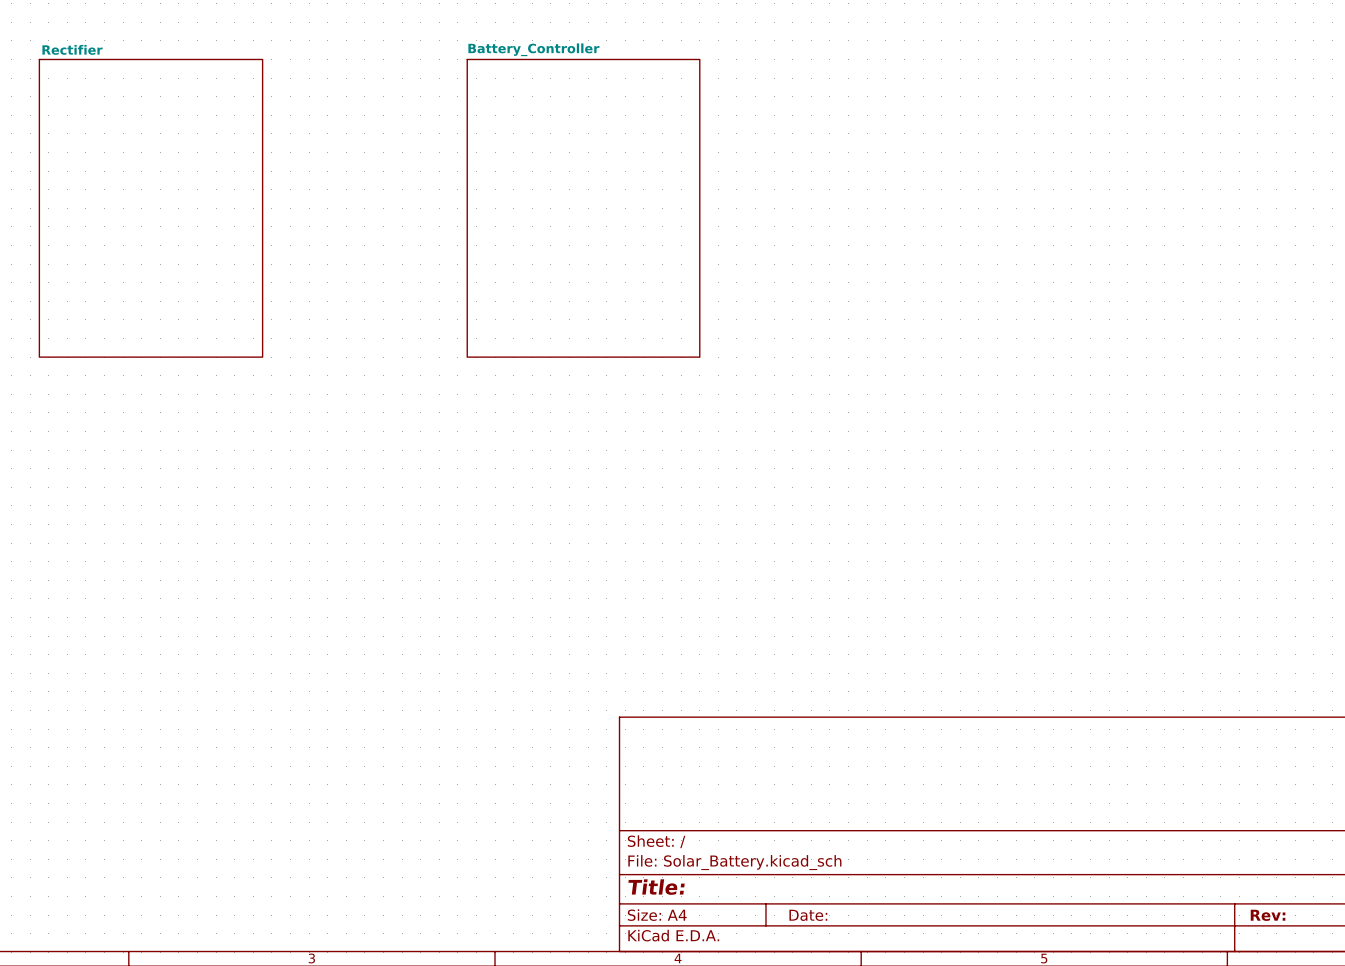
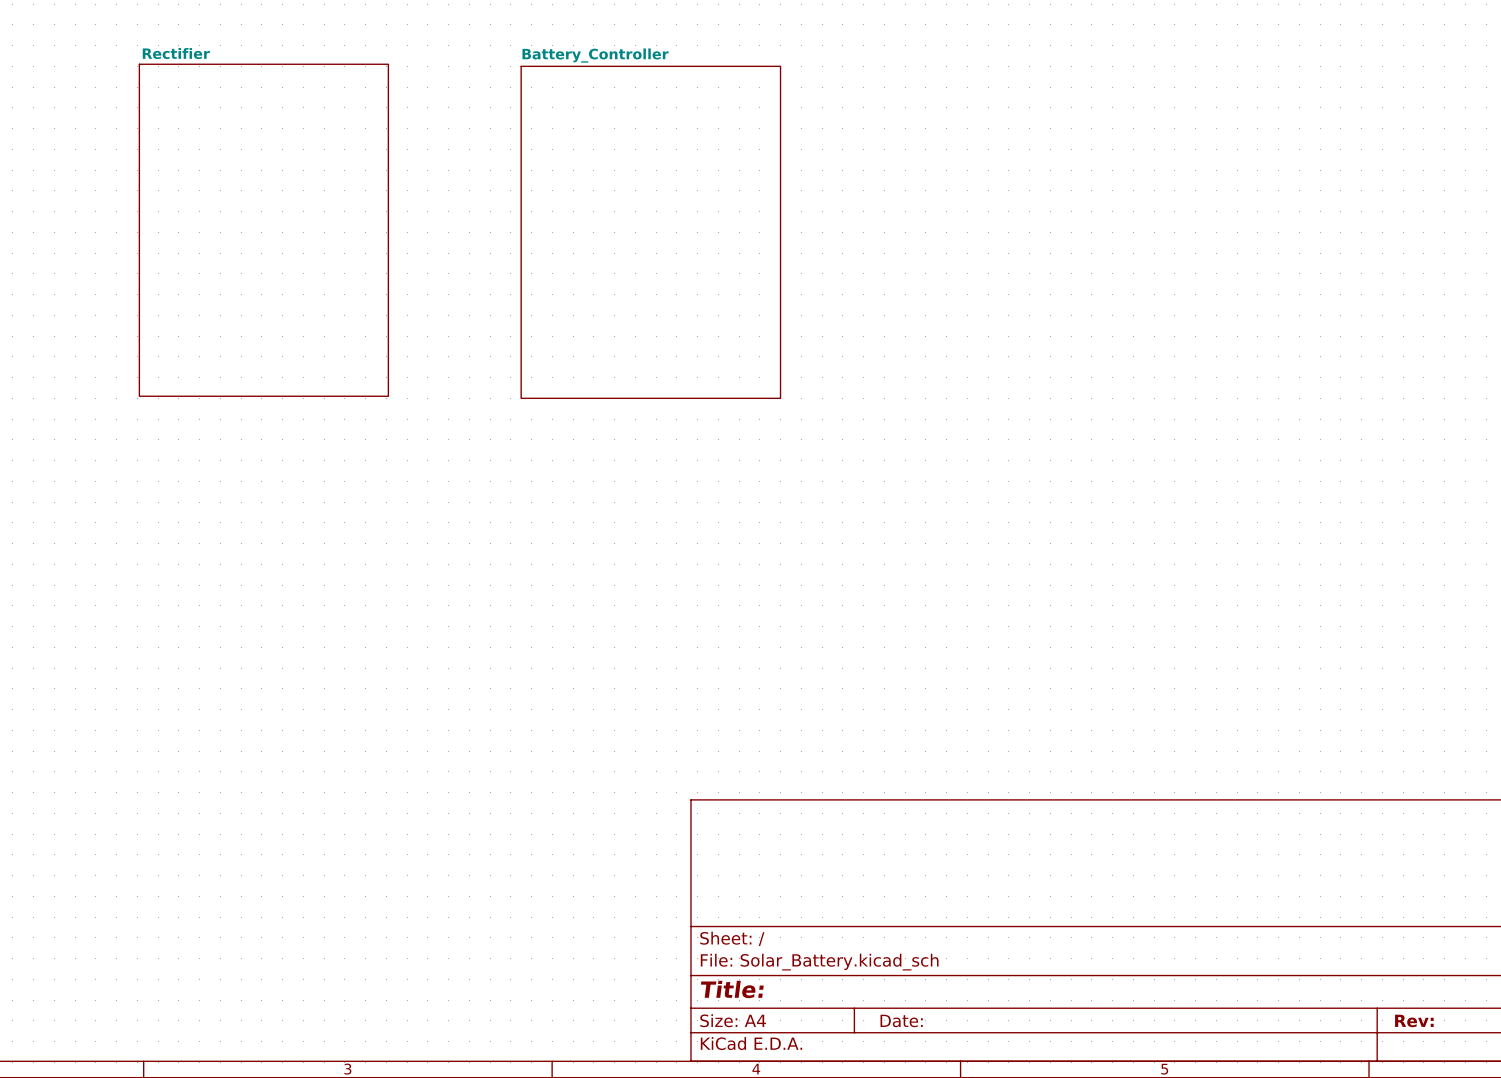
sheet Rectifier position: (151, 208) -> (263, 230)

